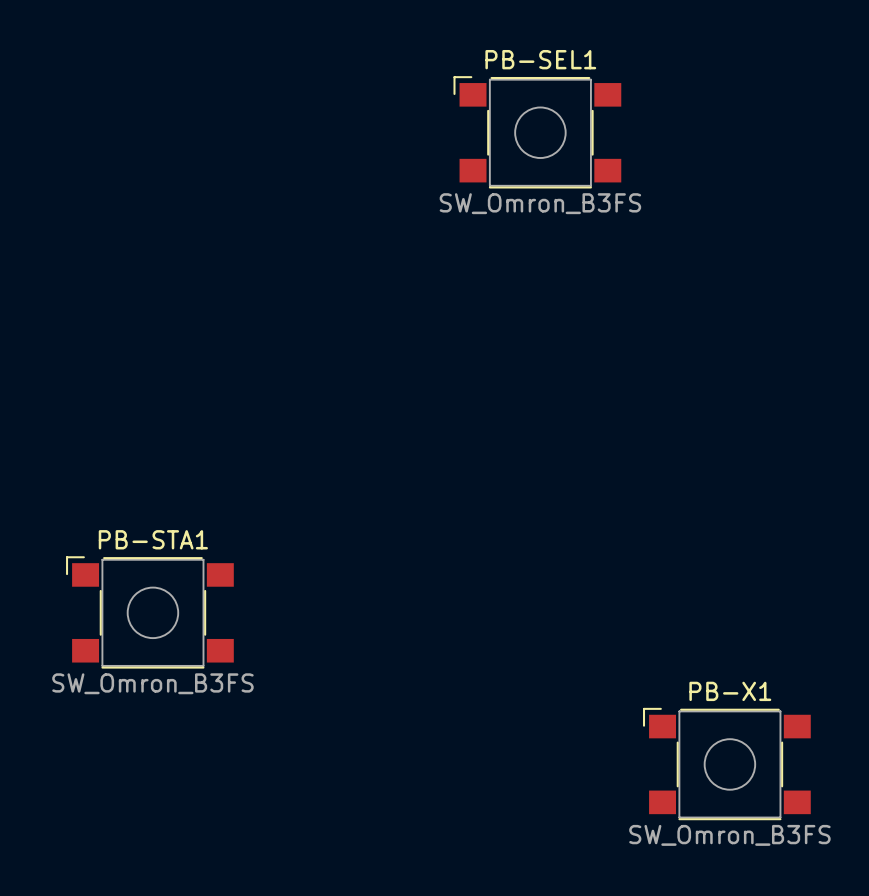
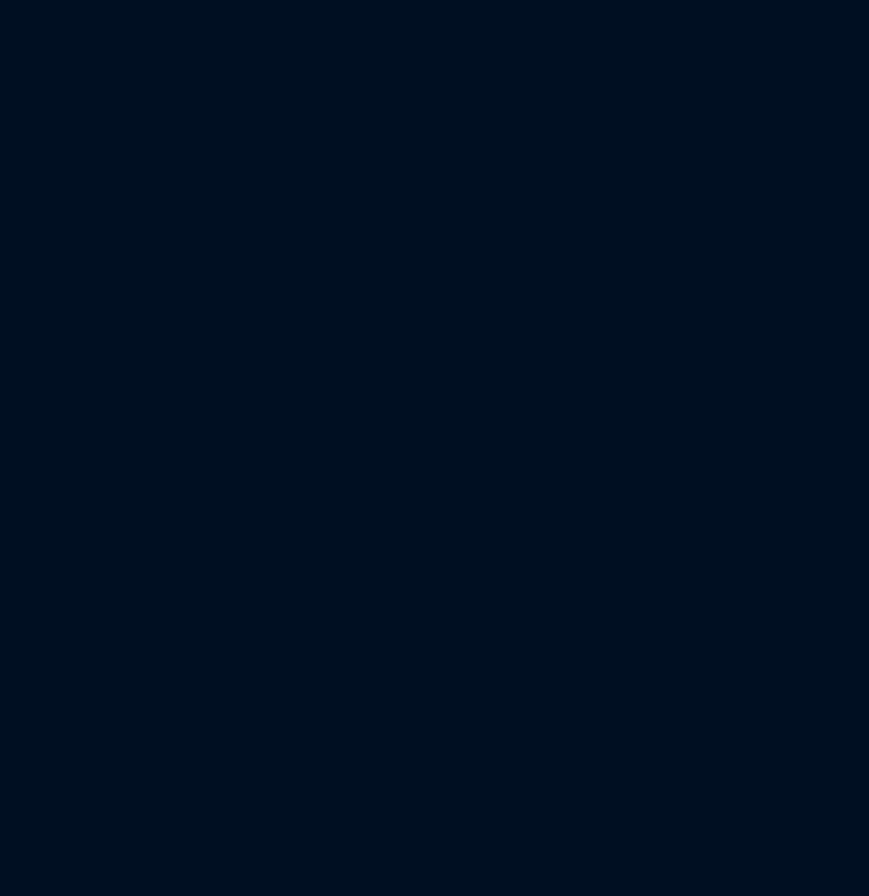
PB-SEL1: SW_Omron_B3FS (537, 132) -> none
PB-STA1: SW_Omron_B3FS (149, 612) -> none
PB-X1: SW_Omron_B3FS (726, 764) -> none

